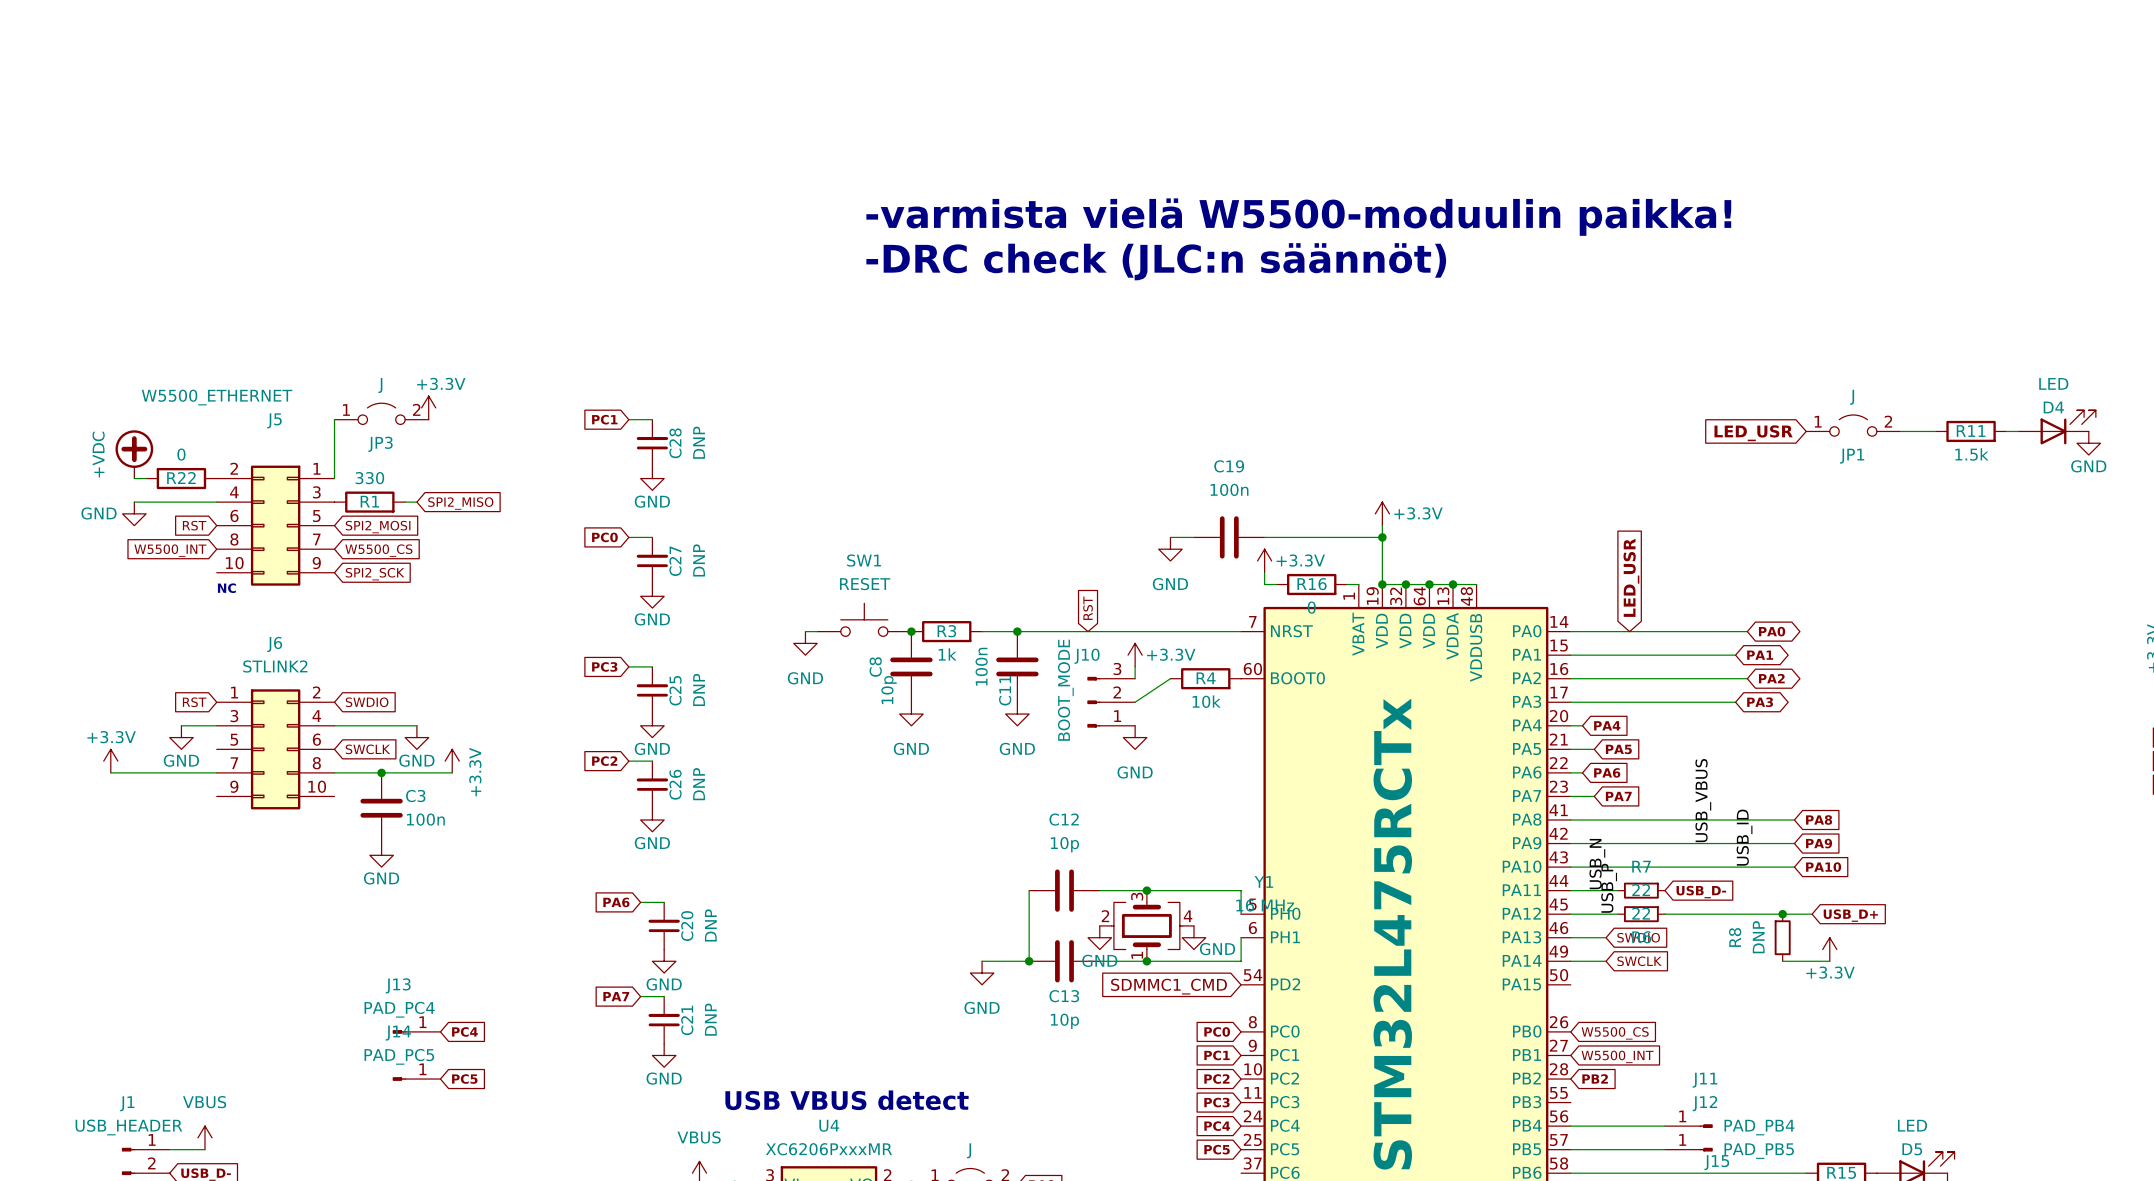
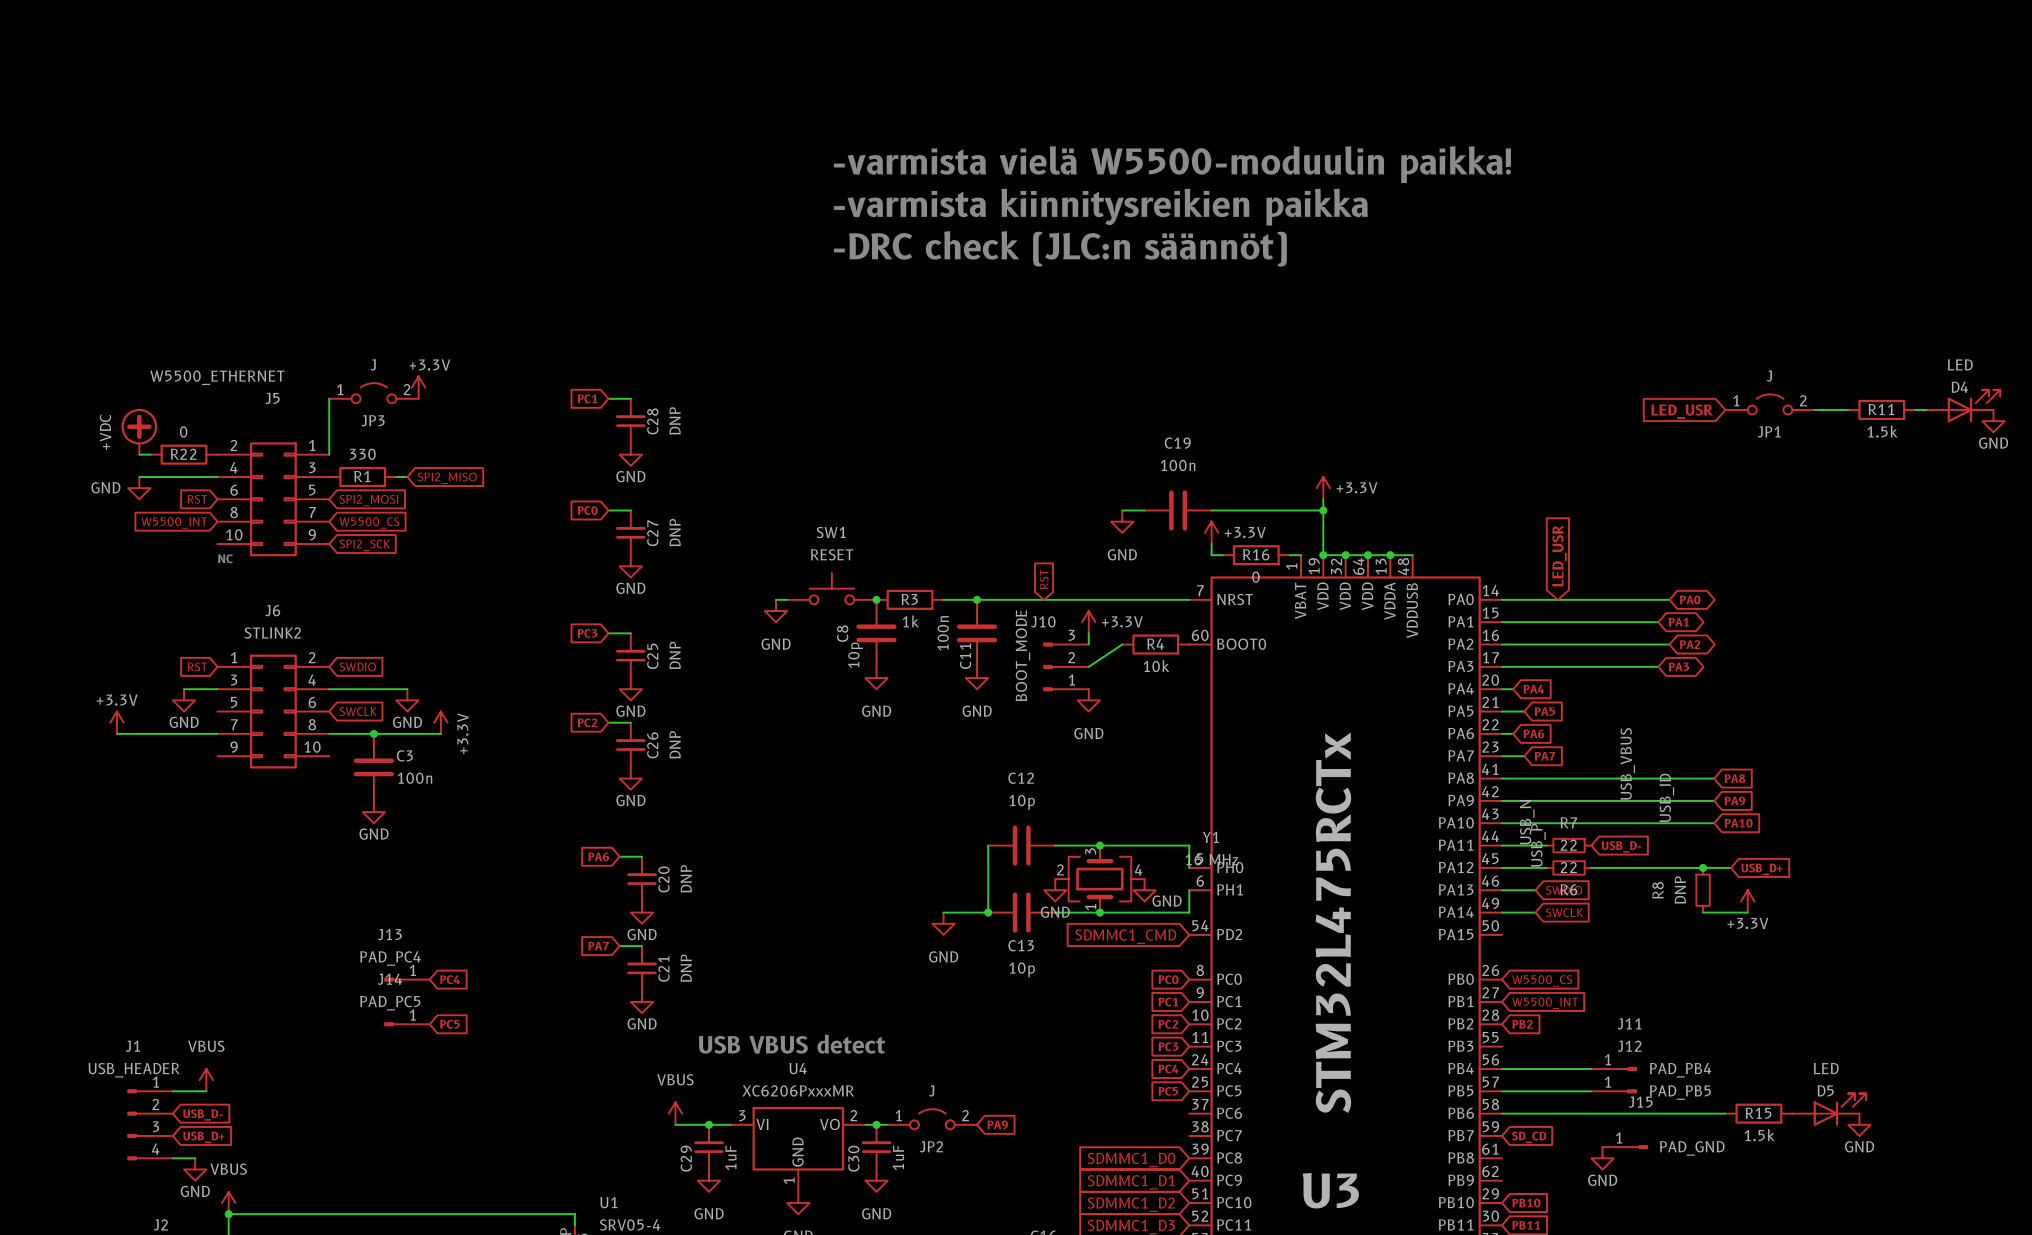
text: none -> -varmista vielä W5500-moduulin paikka! (1172, 164)
text: -varmista vielä W5500-moduulin paikka! (1298, 217) -> -varmista kiinnitysreikien paikka (1100, 207)

